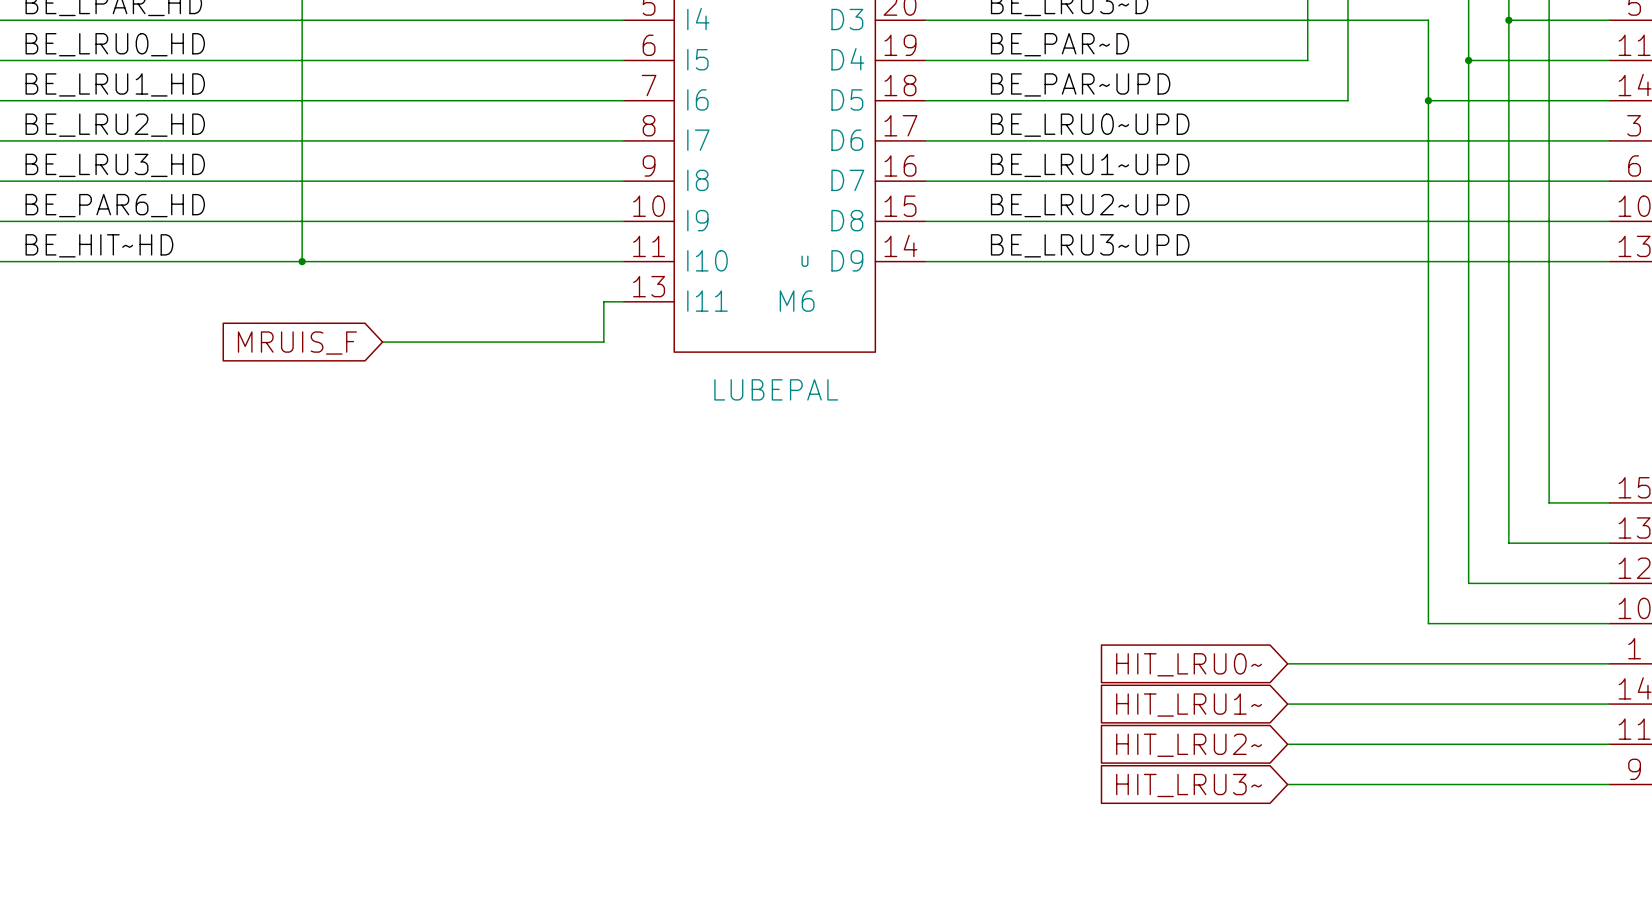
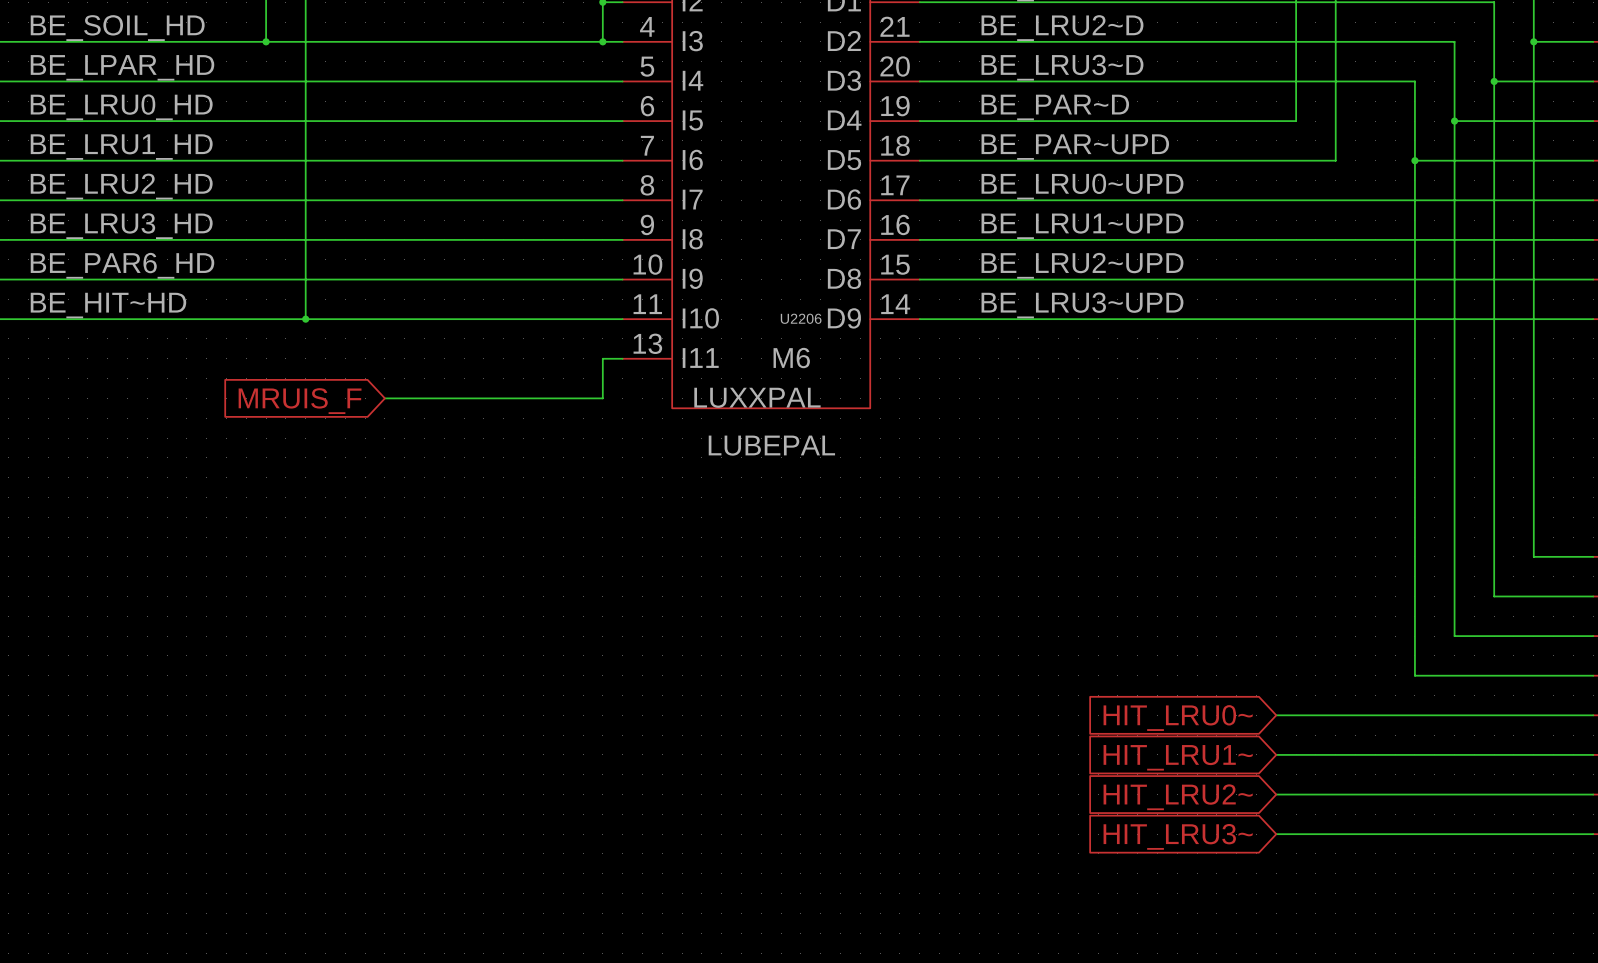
U name: U (804, 261) -> U2206 (801, 318)
U value: none -> LUXXPAL (757, 397)

